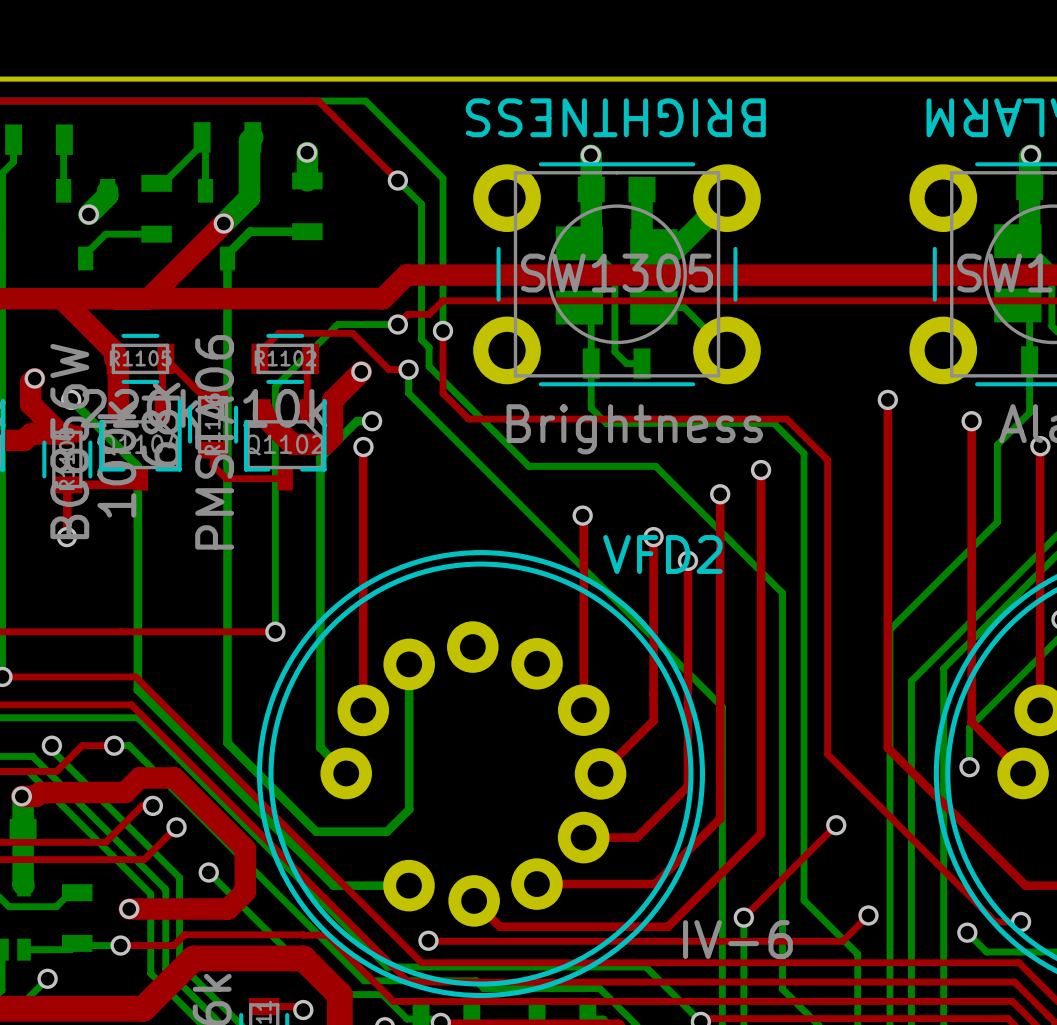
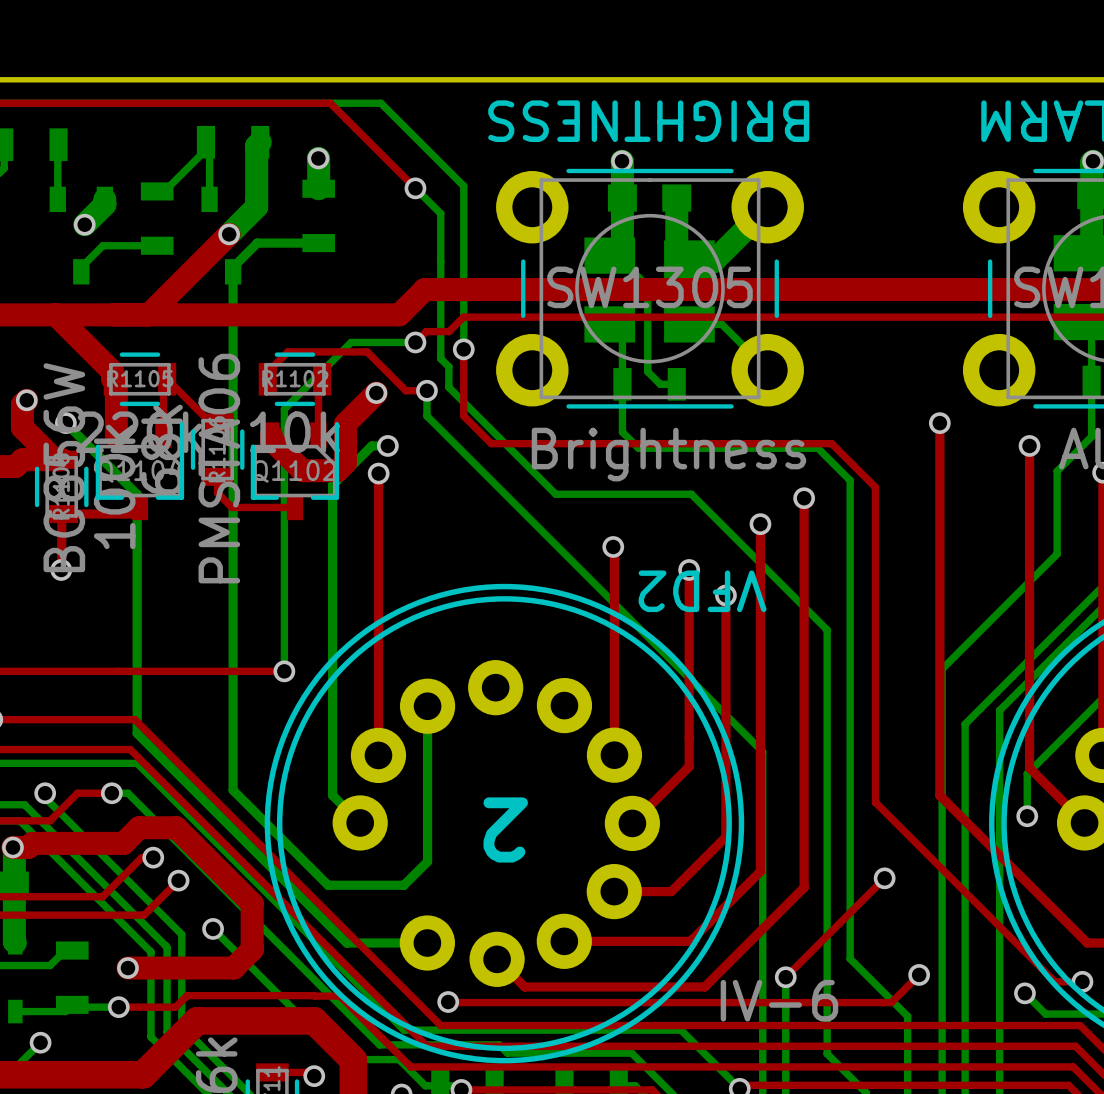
VFD2 name rotation: 0° (662, 554) -> 180° (702, 591)
text: none -> 2 (505, 829)

